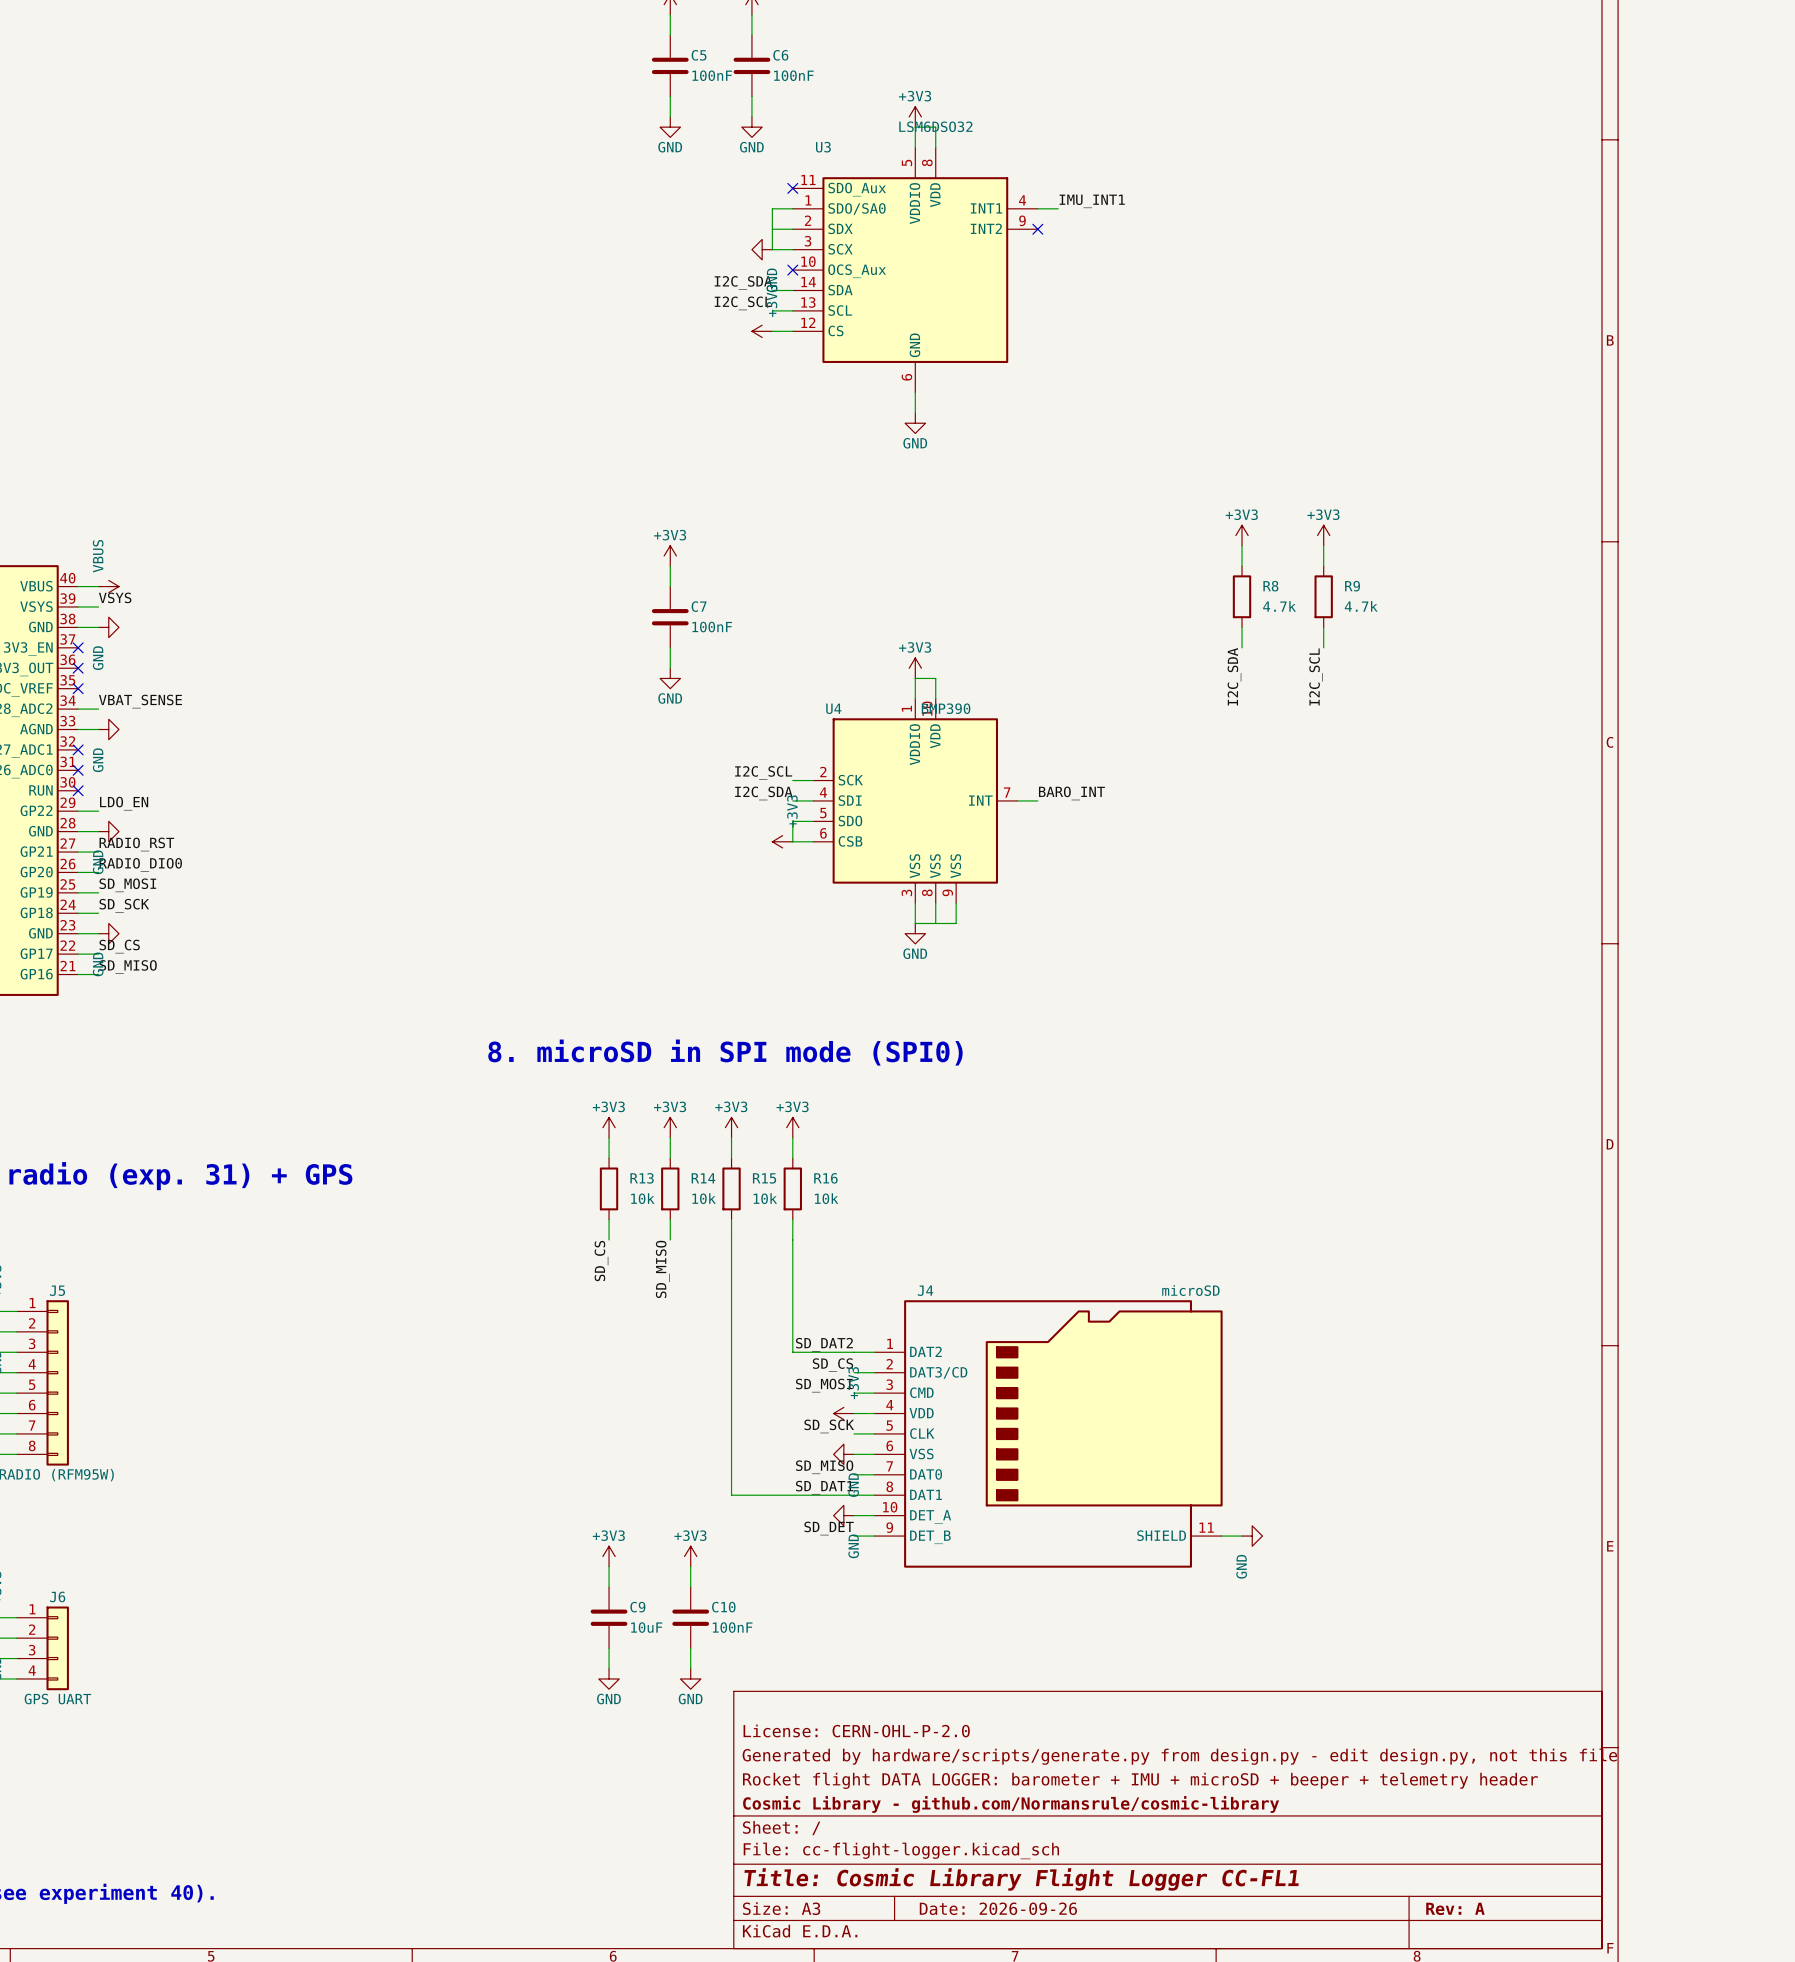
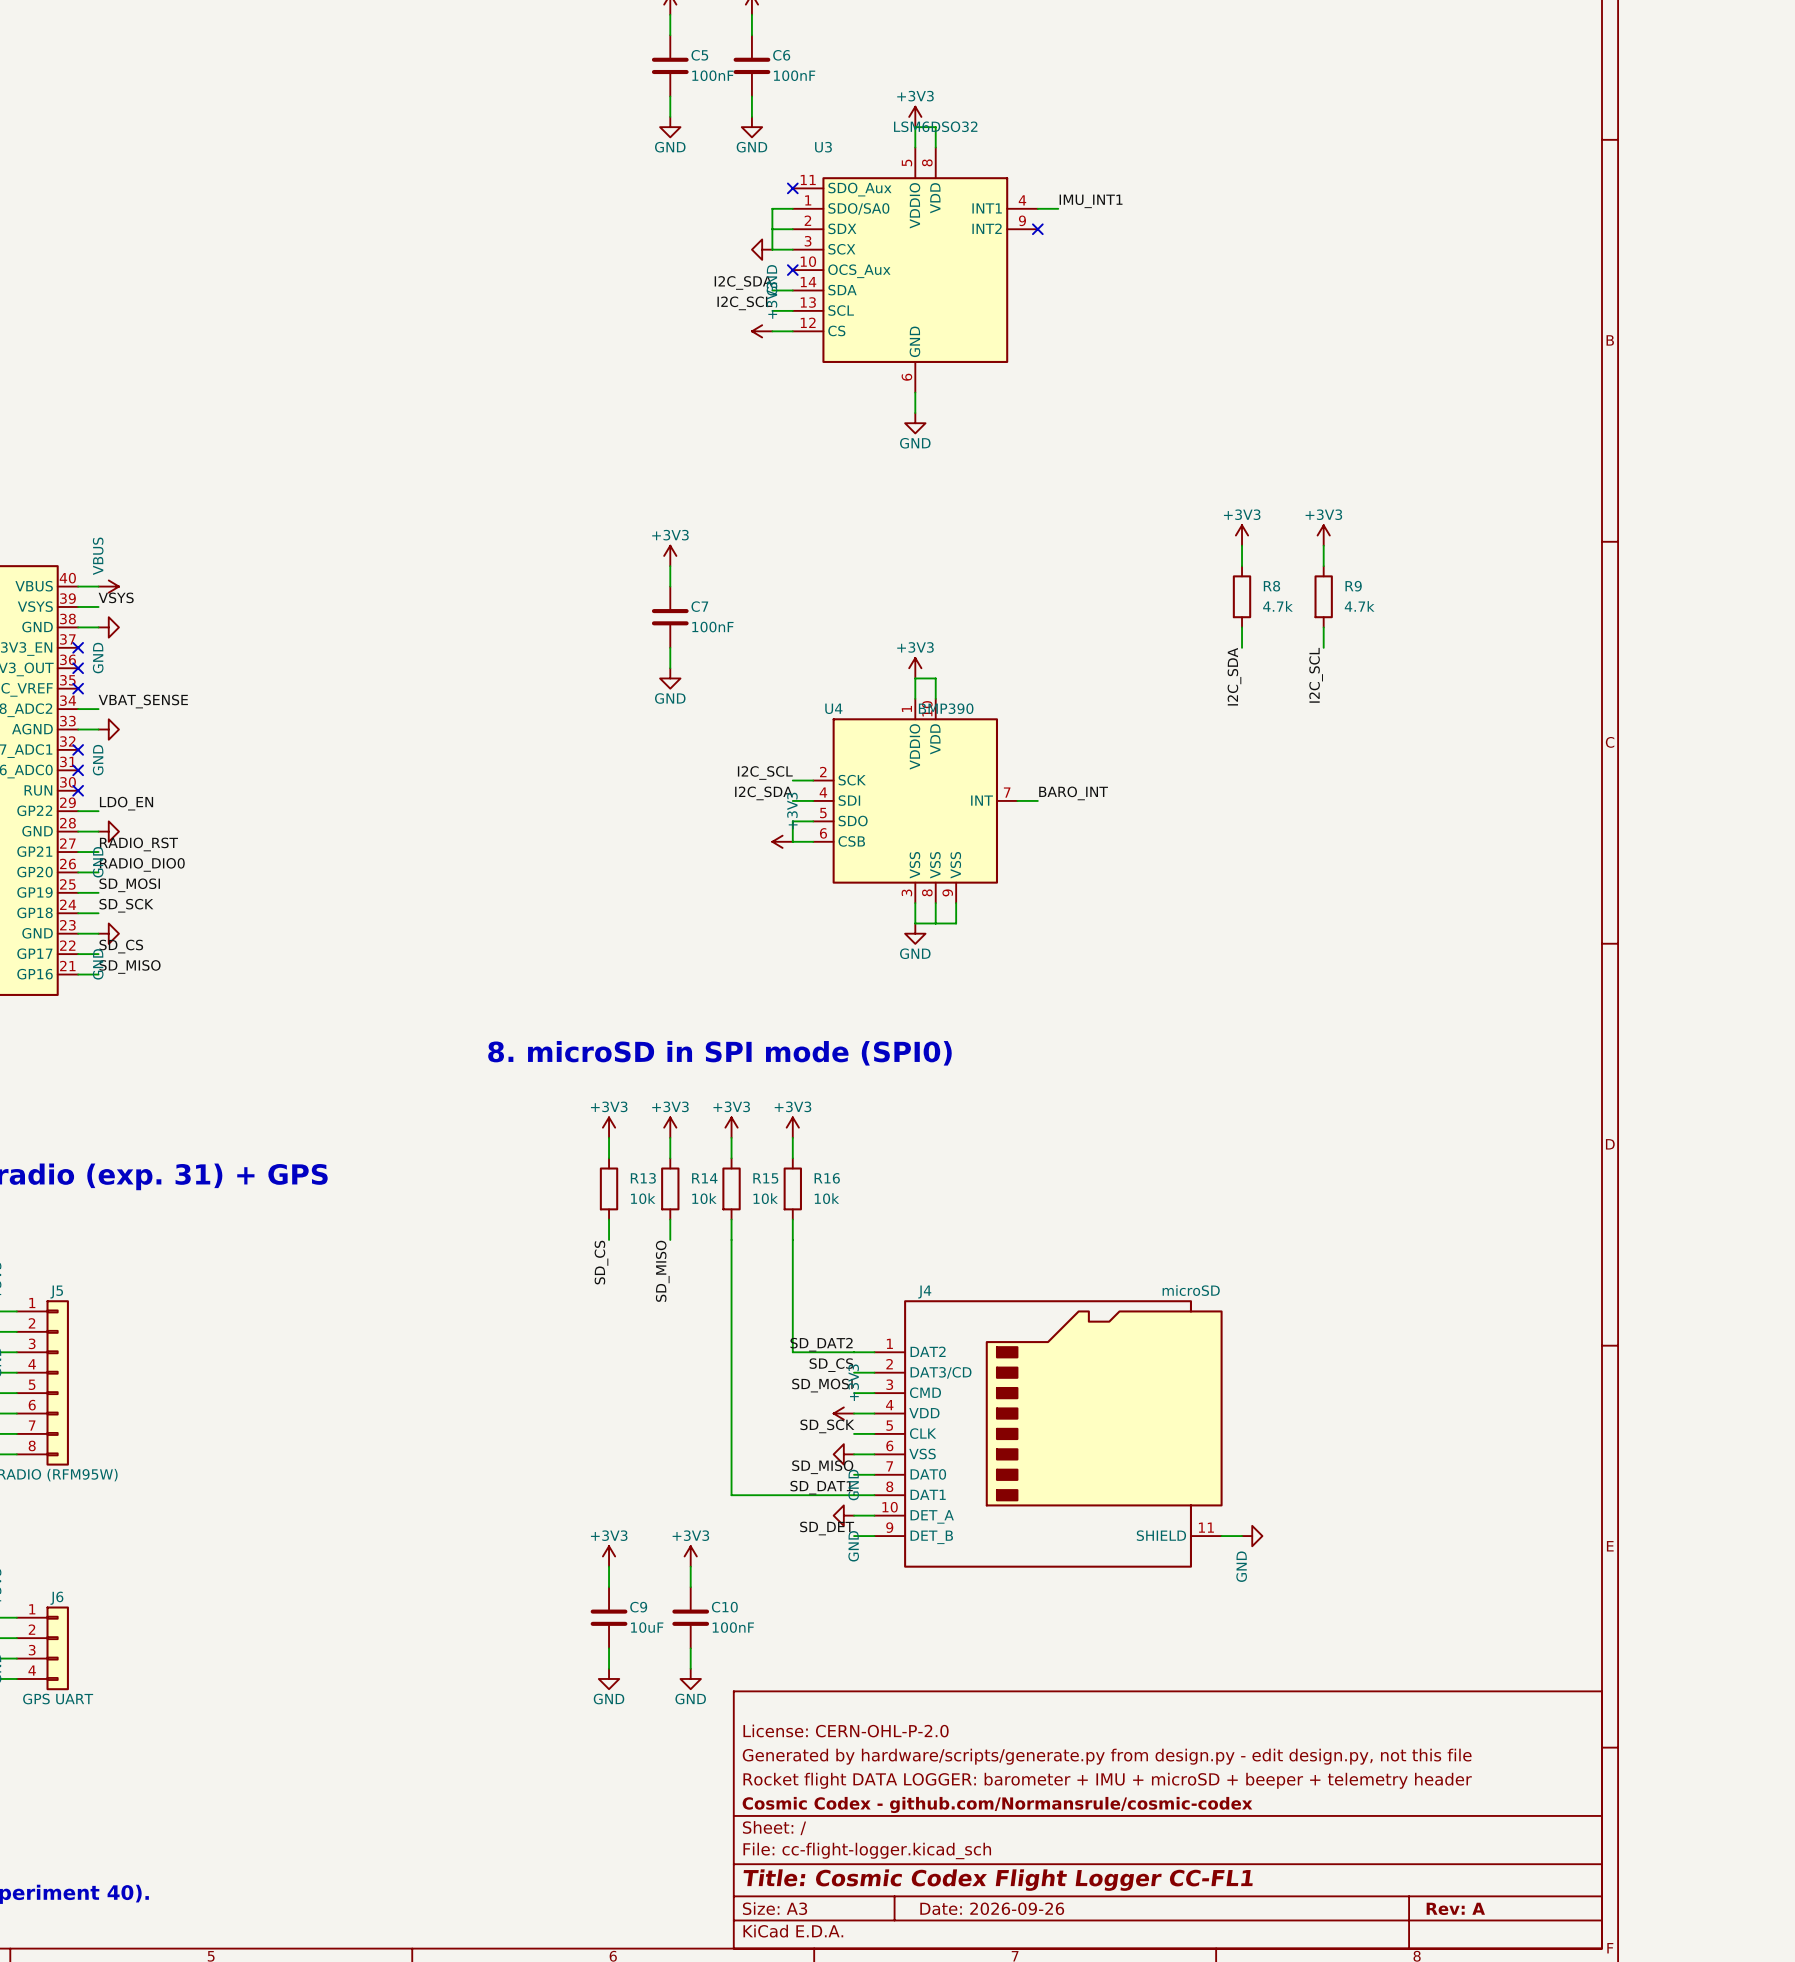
title block: Cosmic Library - github.com/Normansrule/cosmic-library (1011, 1804) -> Cosmic Codex - github.com/Normansrule/cosmic-codex (997, 1804)
title block: Title: Cosmic Library Flight Logger CC-FL1 (1021, 1879) -> Title: Cosmic Codex Flight Logger CC-FL1 (998, 1880)

